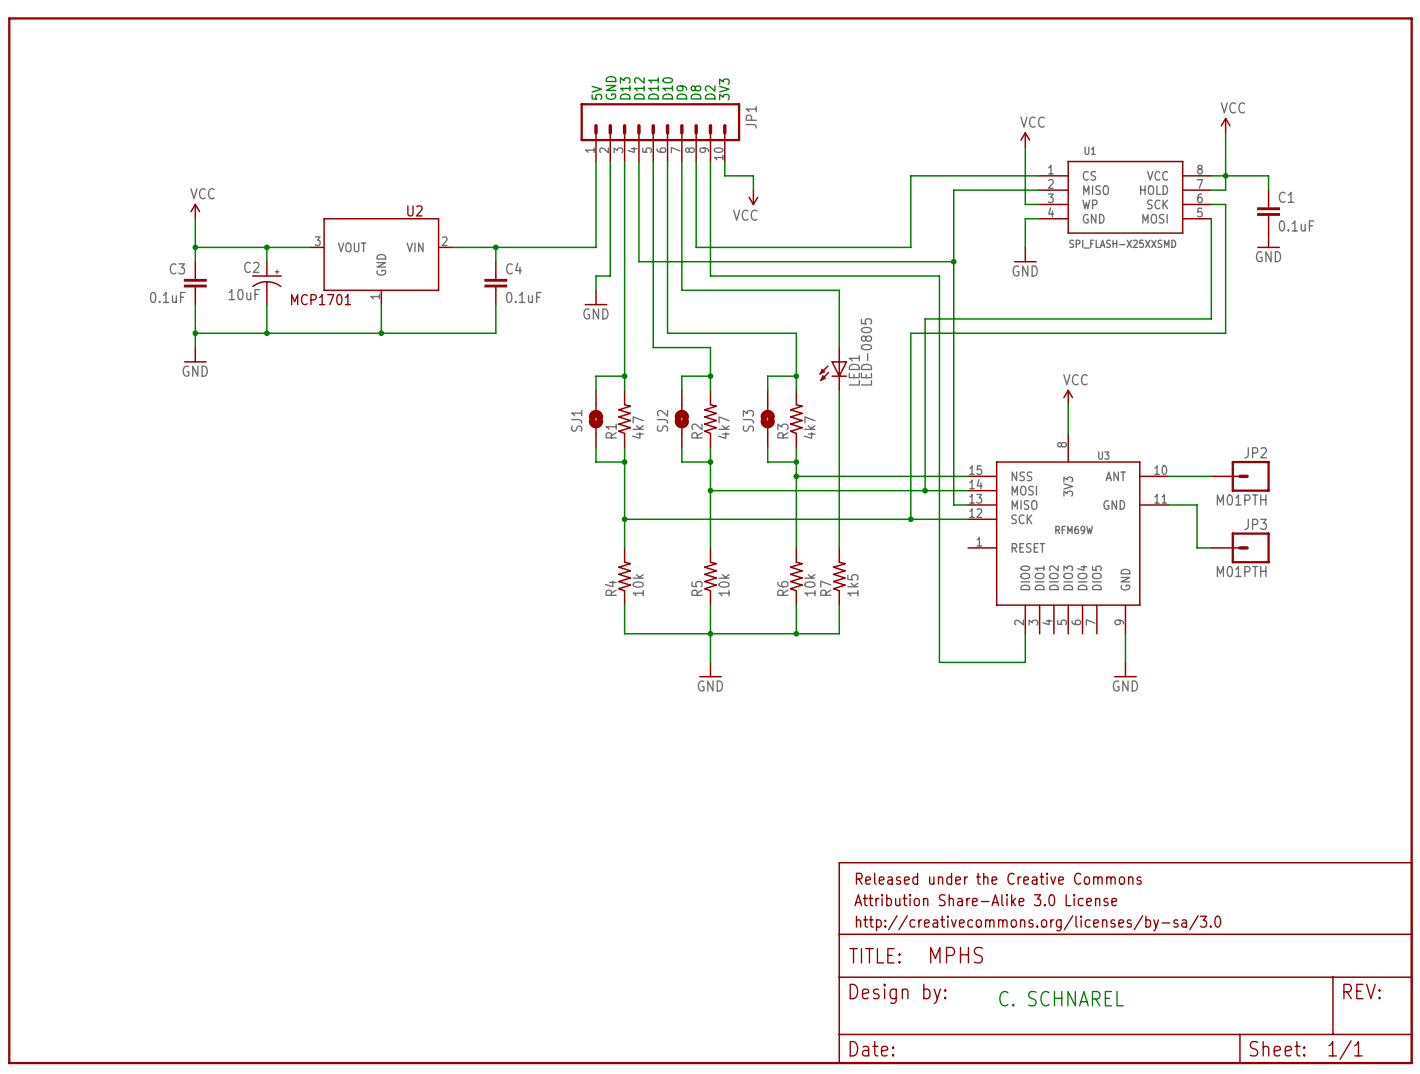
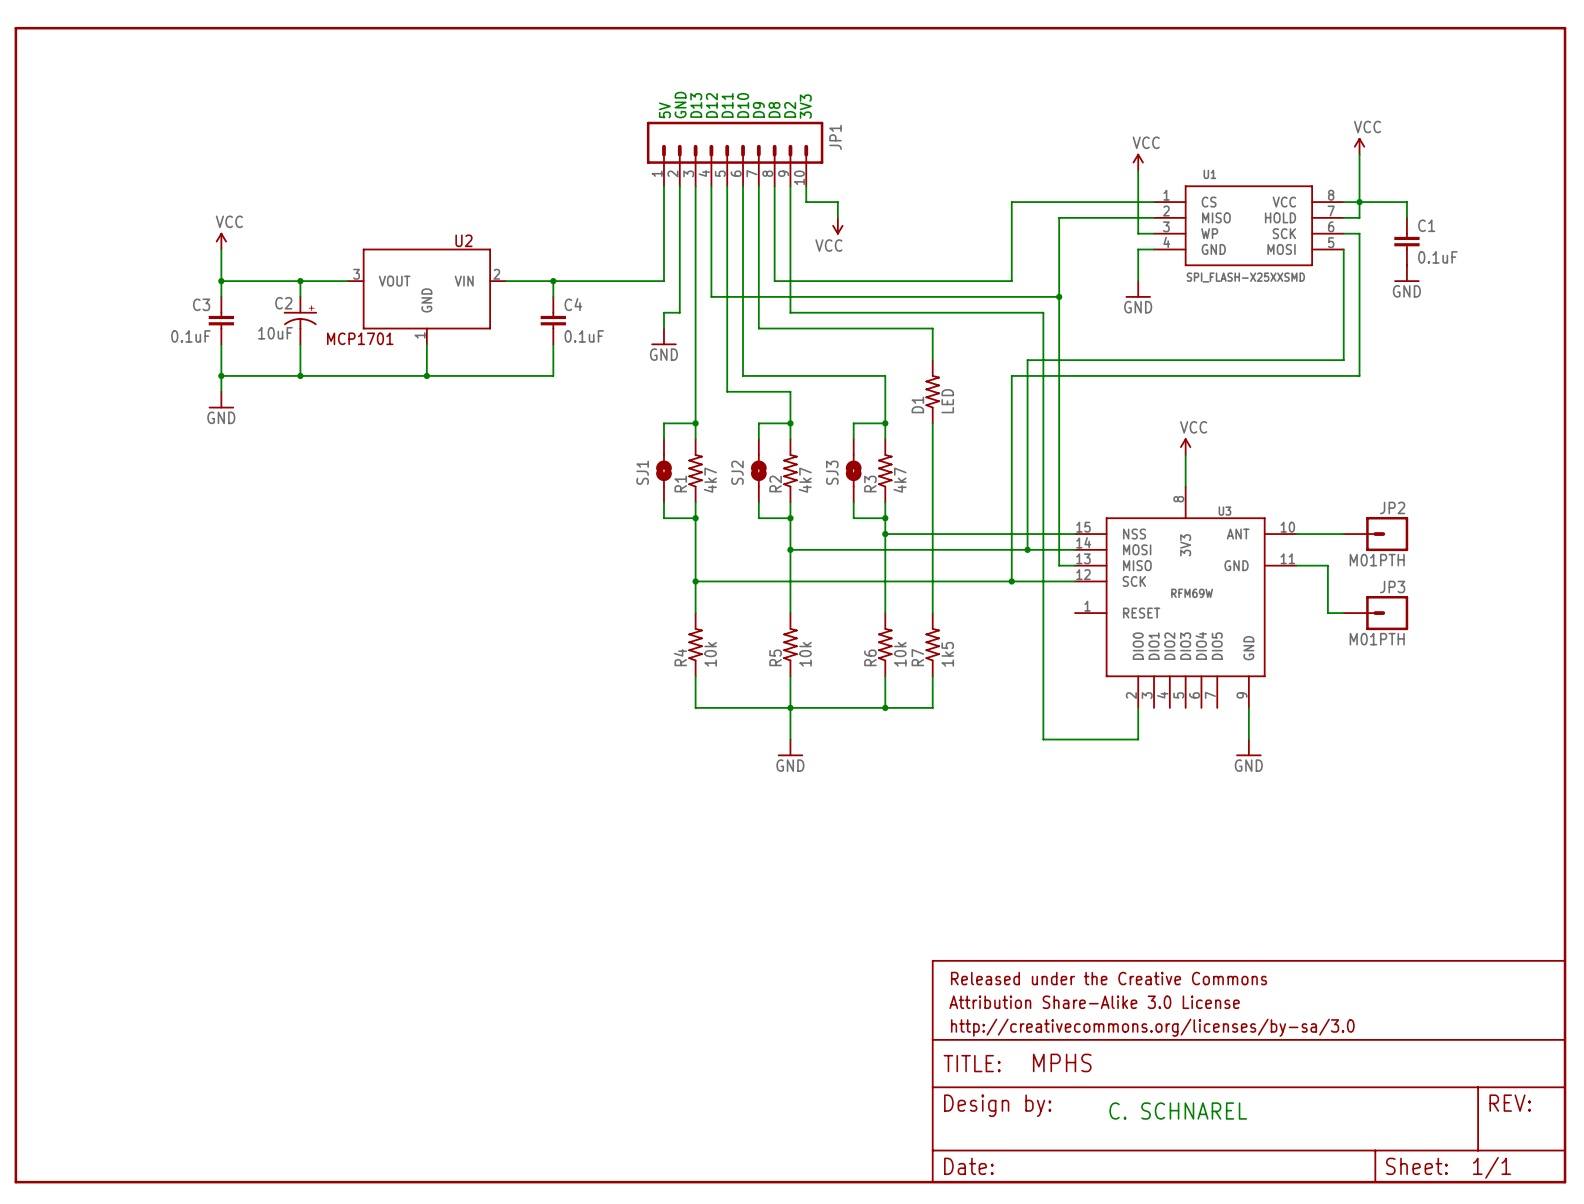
D1: none -> LED (932, 391)
LED1: LED-0805 (833, 369) -> none

